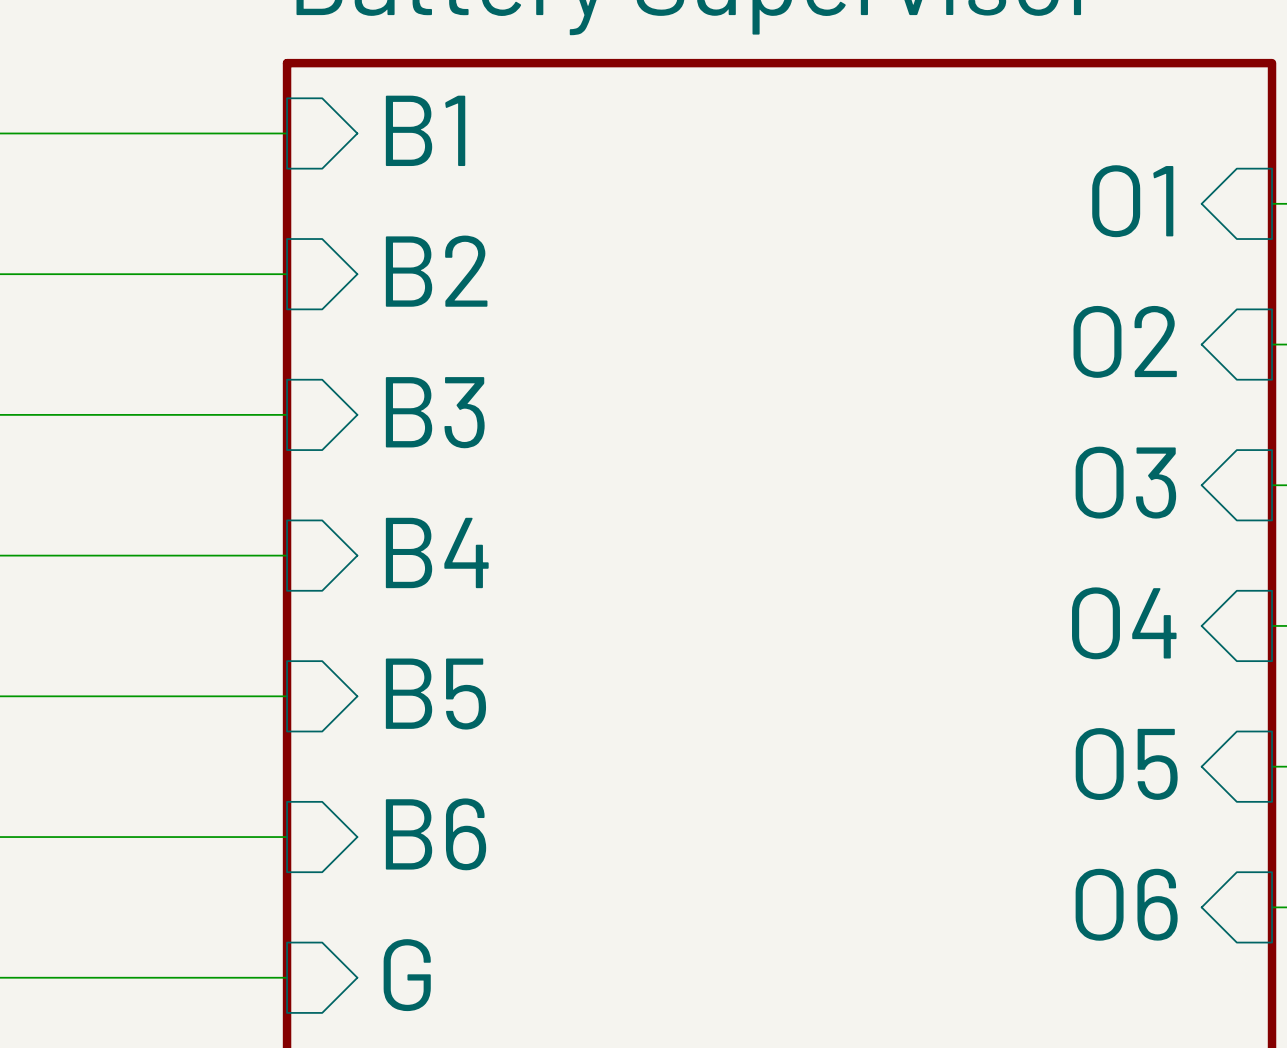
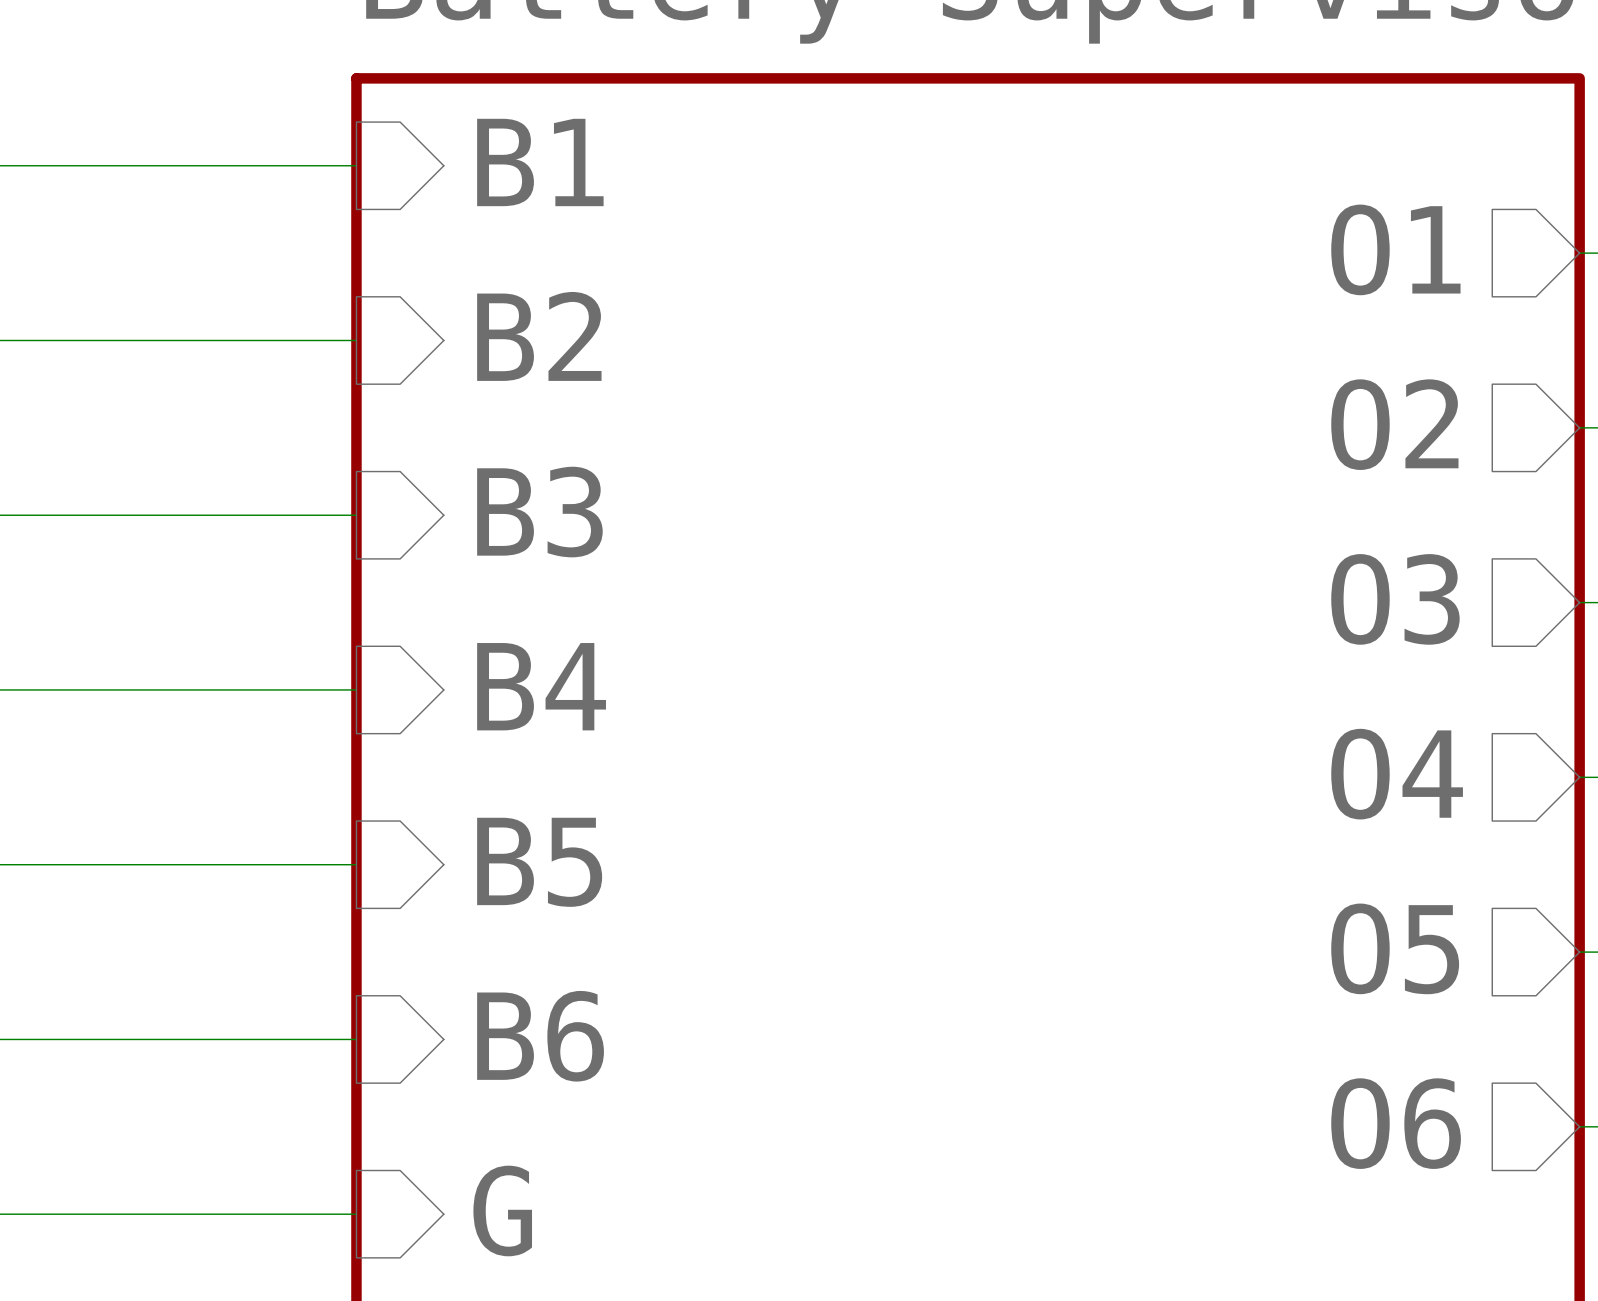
sheet pin shape: input (1132, 201) -> output (1395, 249)
sheet pin shape: input (1125, 341) -> output (1394, 424)
sheet pin shape: input (1125, 482) -> output (1395, 599)
sheet pin shape: input (1124, 623) -> output (1397, 774)
sheet pin shape: input (1126, 764) -> output (1395, 948)
sheet pin shape: input (1126, 904) -> output (1396, 1123)

